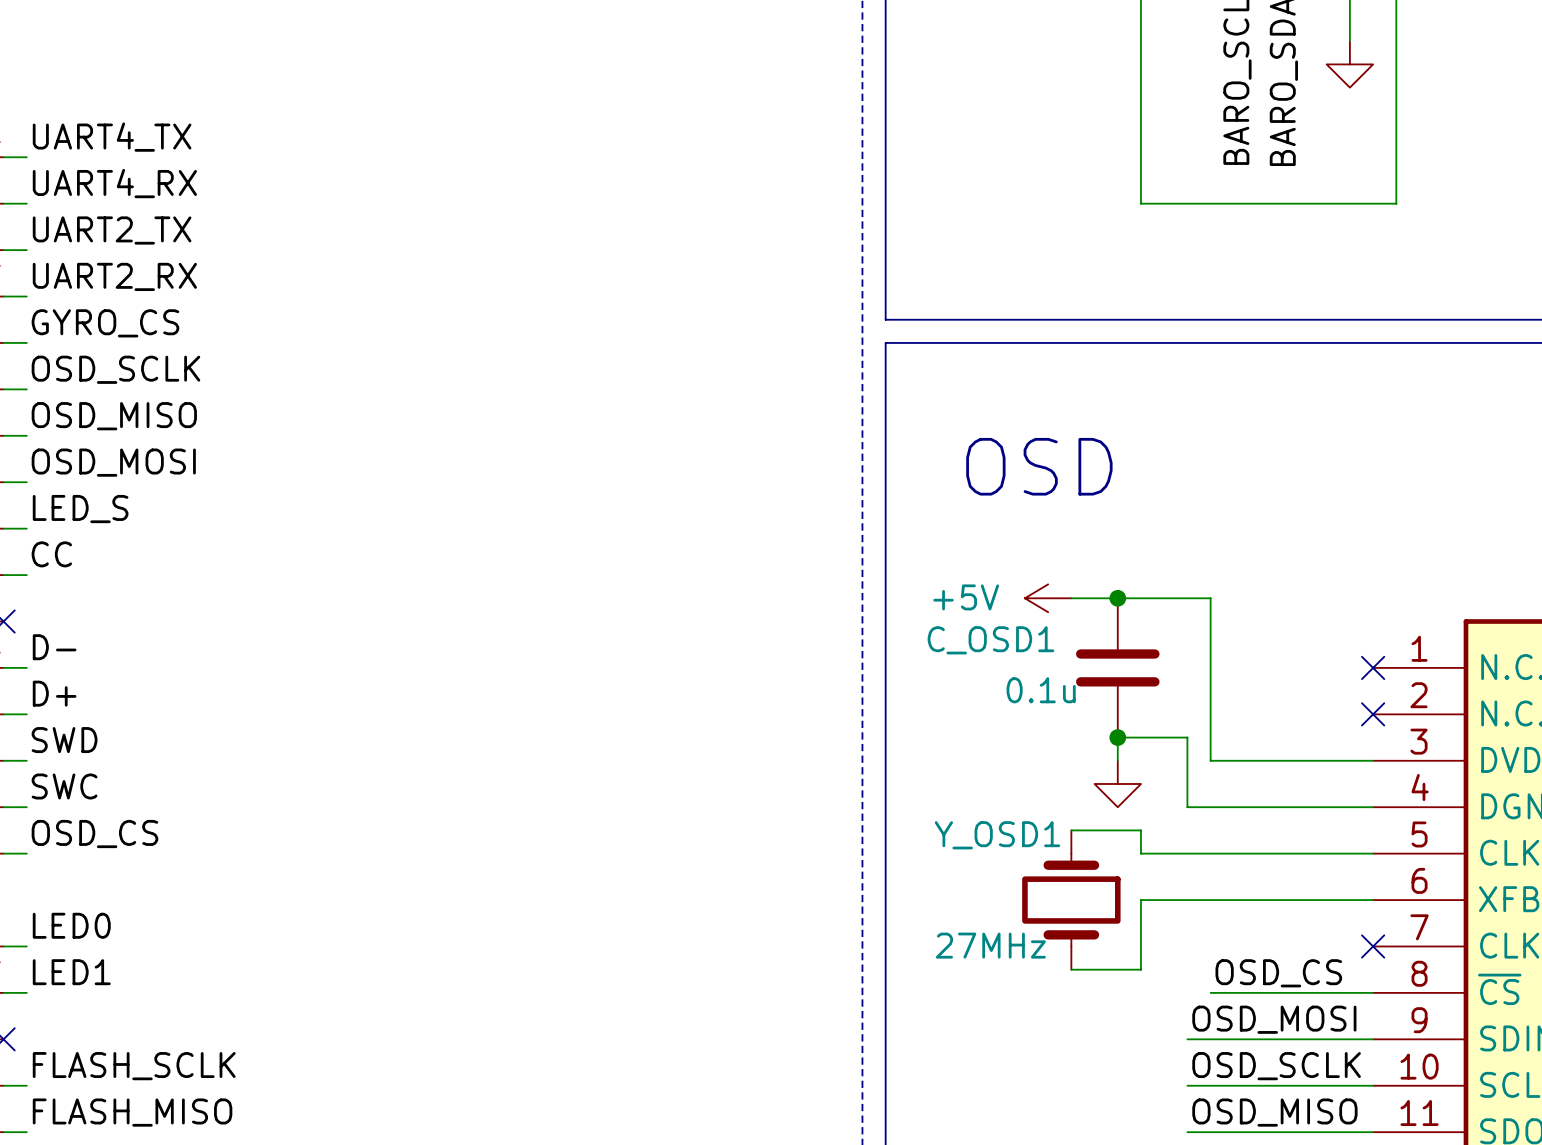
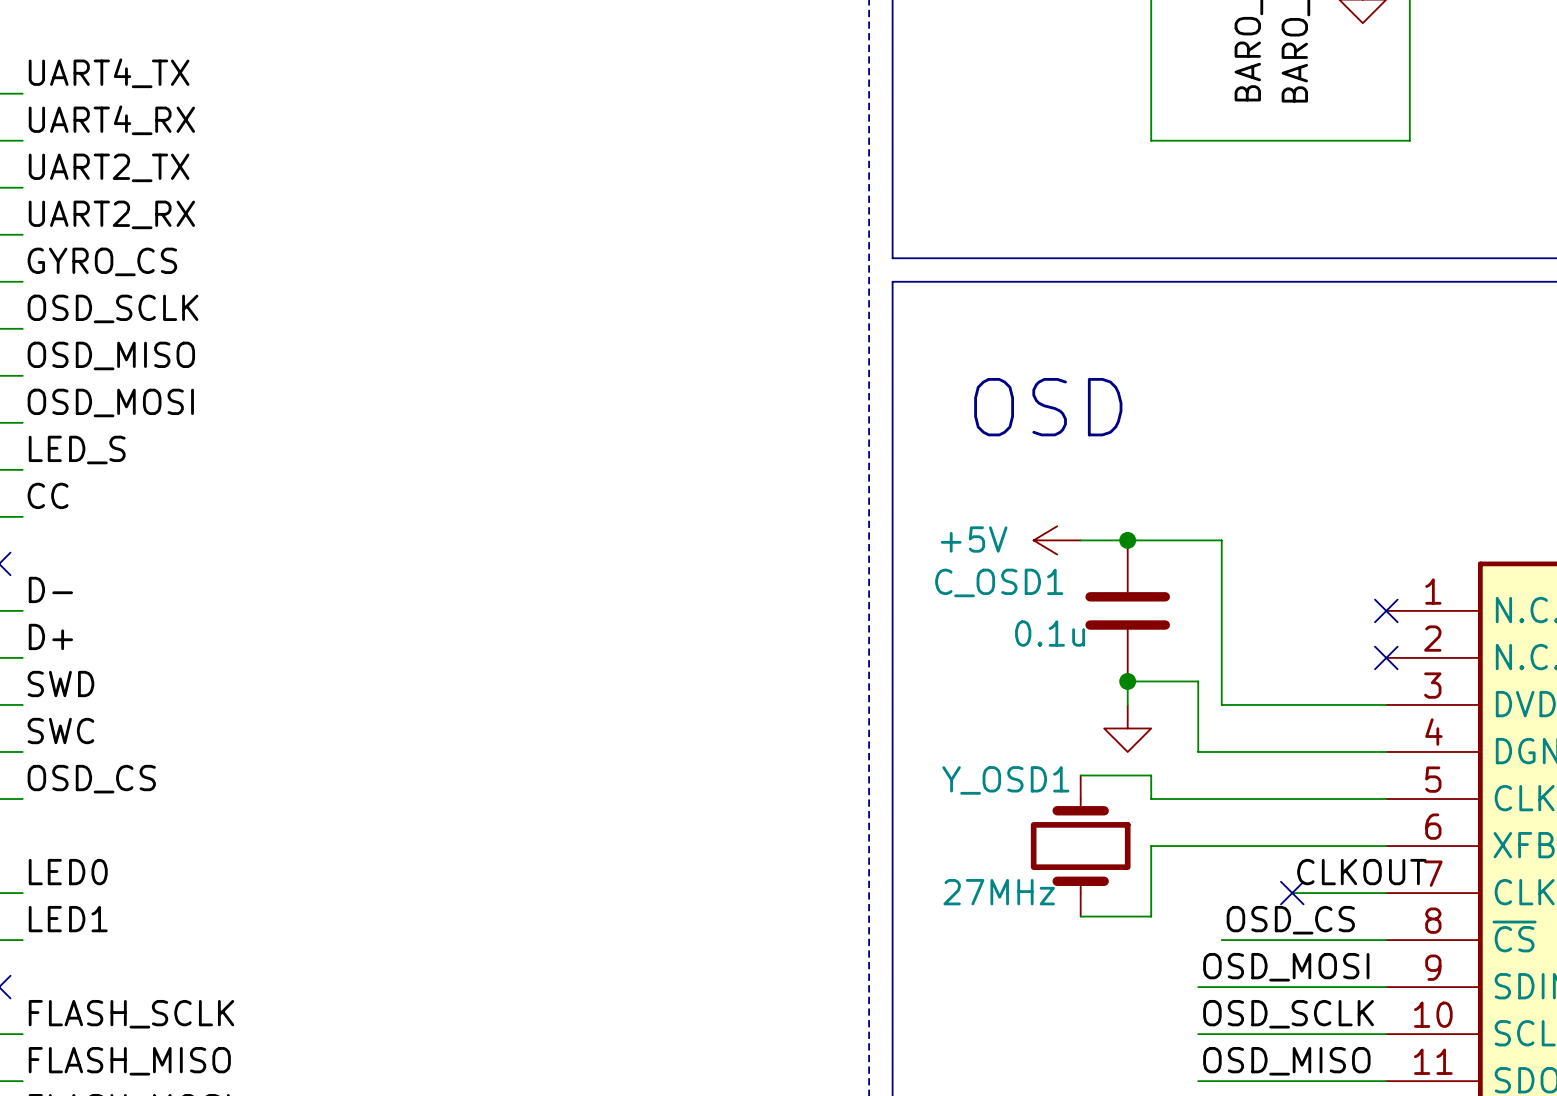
label: none -> CLKOUT (1361, 872)
wire: none -> (1292, 893) (1386, 893)
no-connect mark position: (1373, 946) -> (1292, 893)

